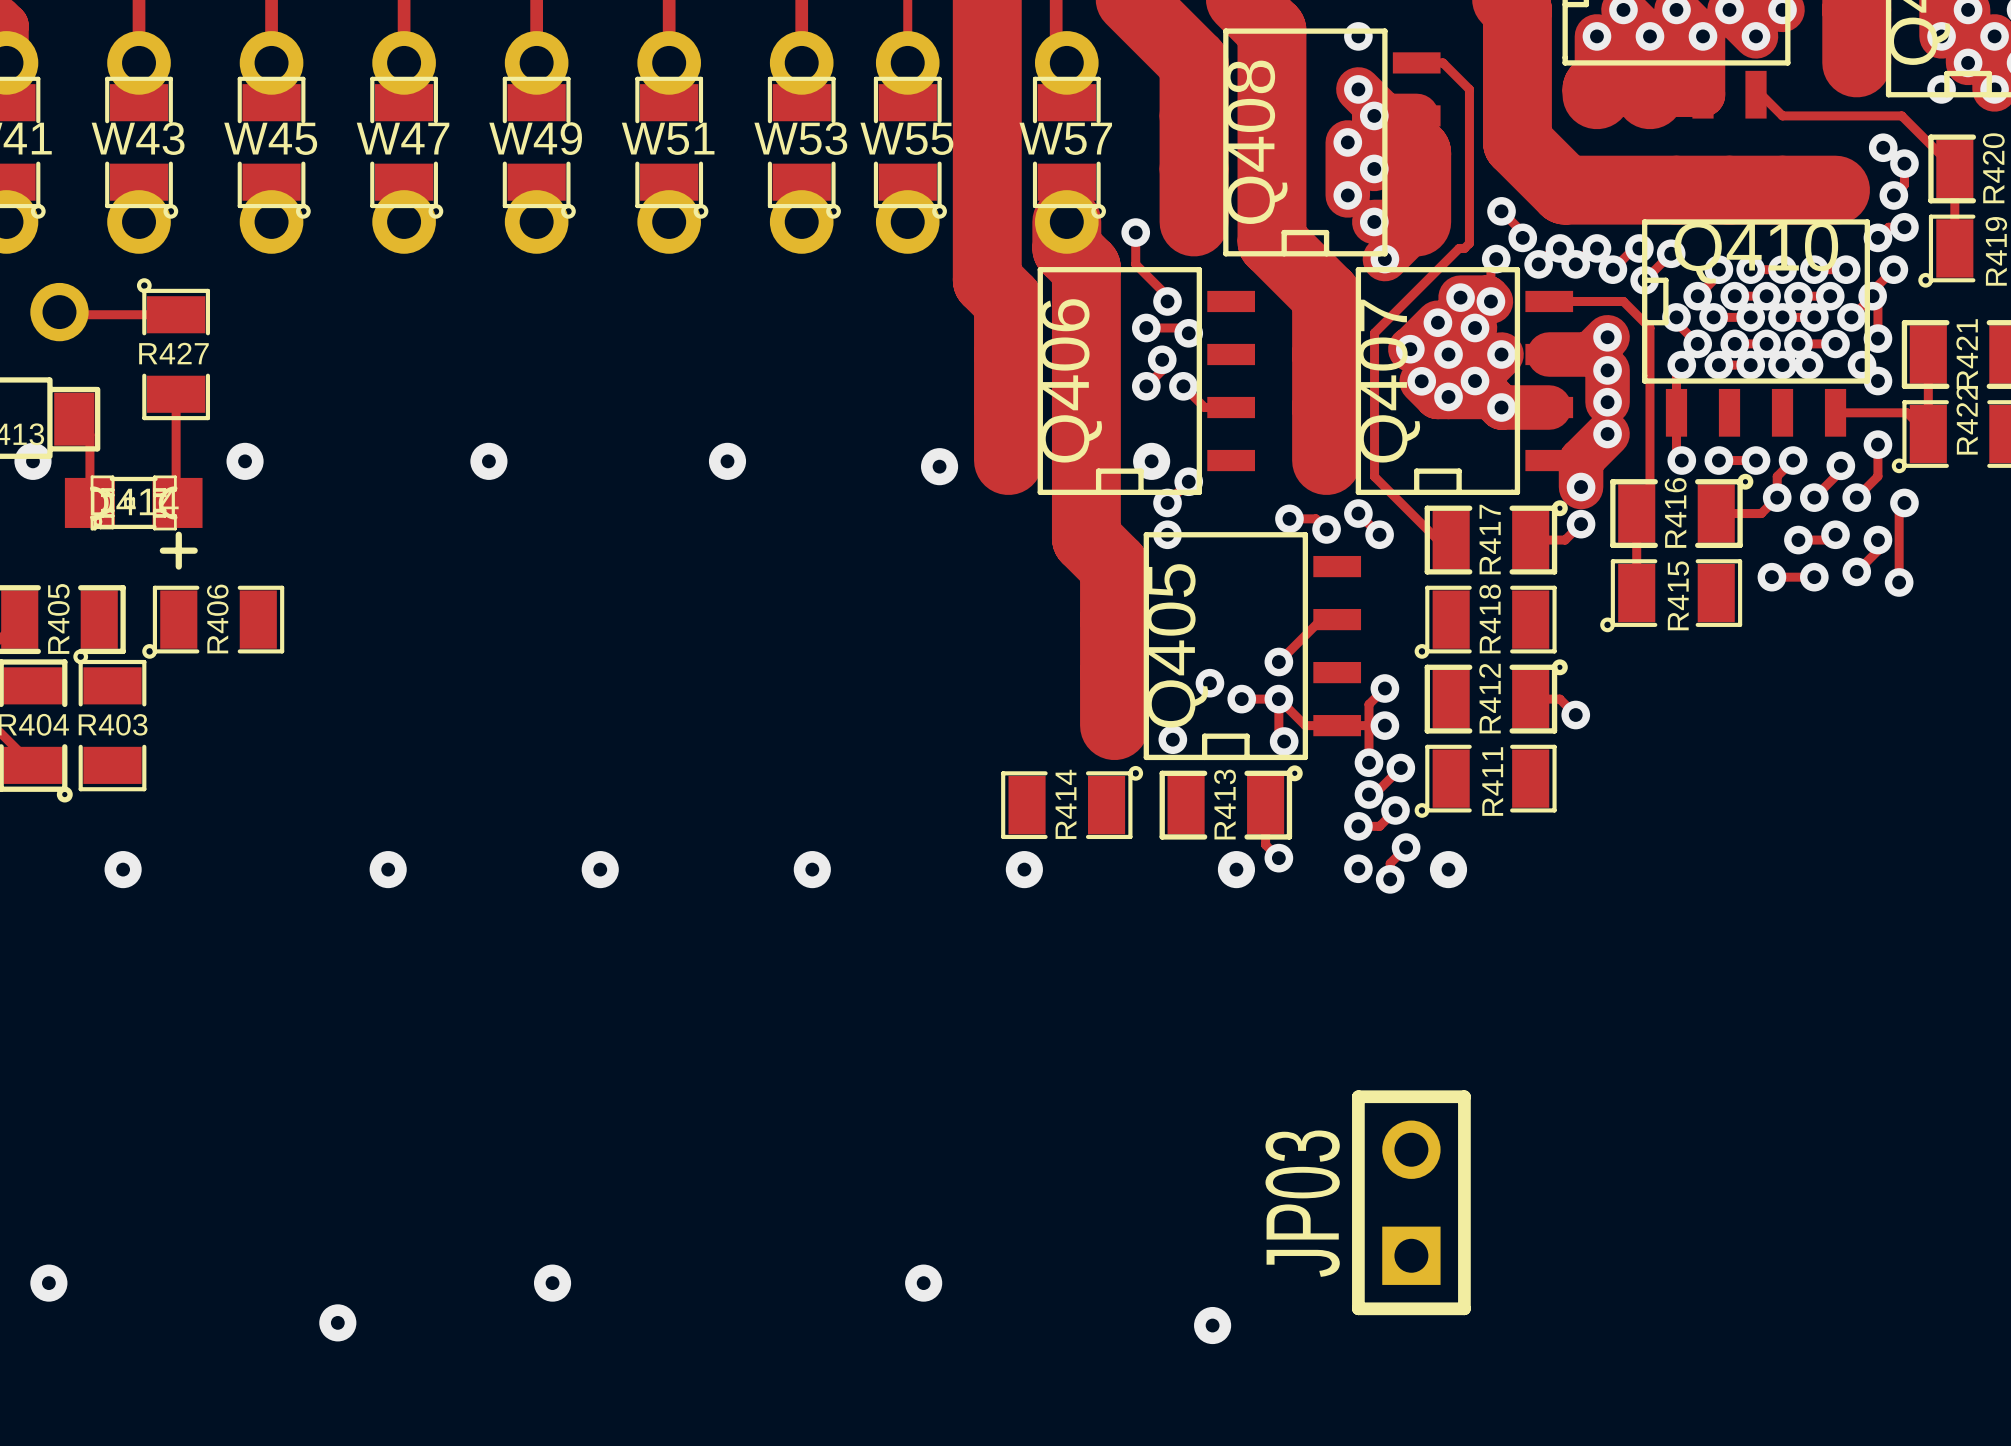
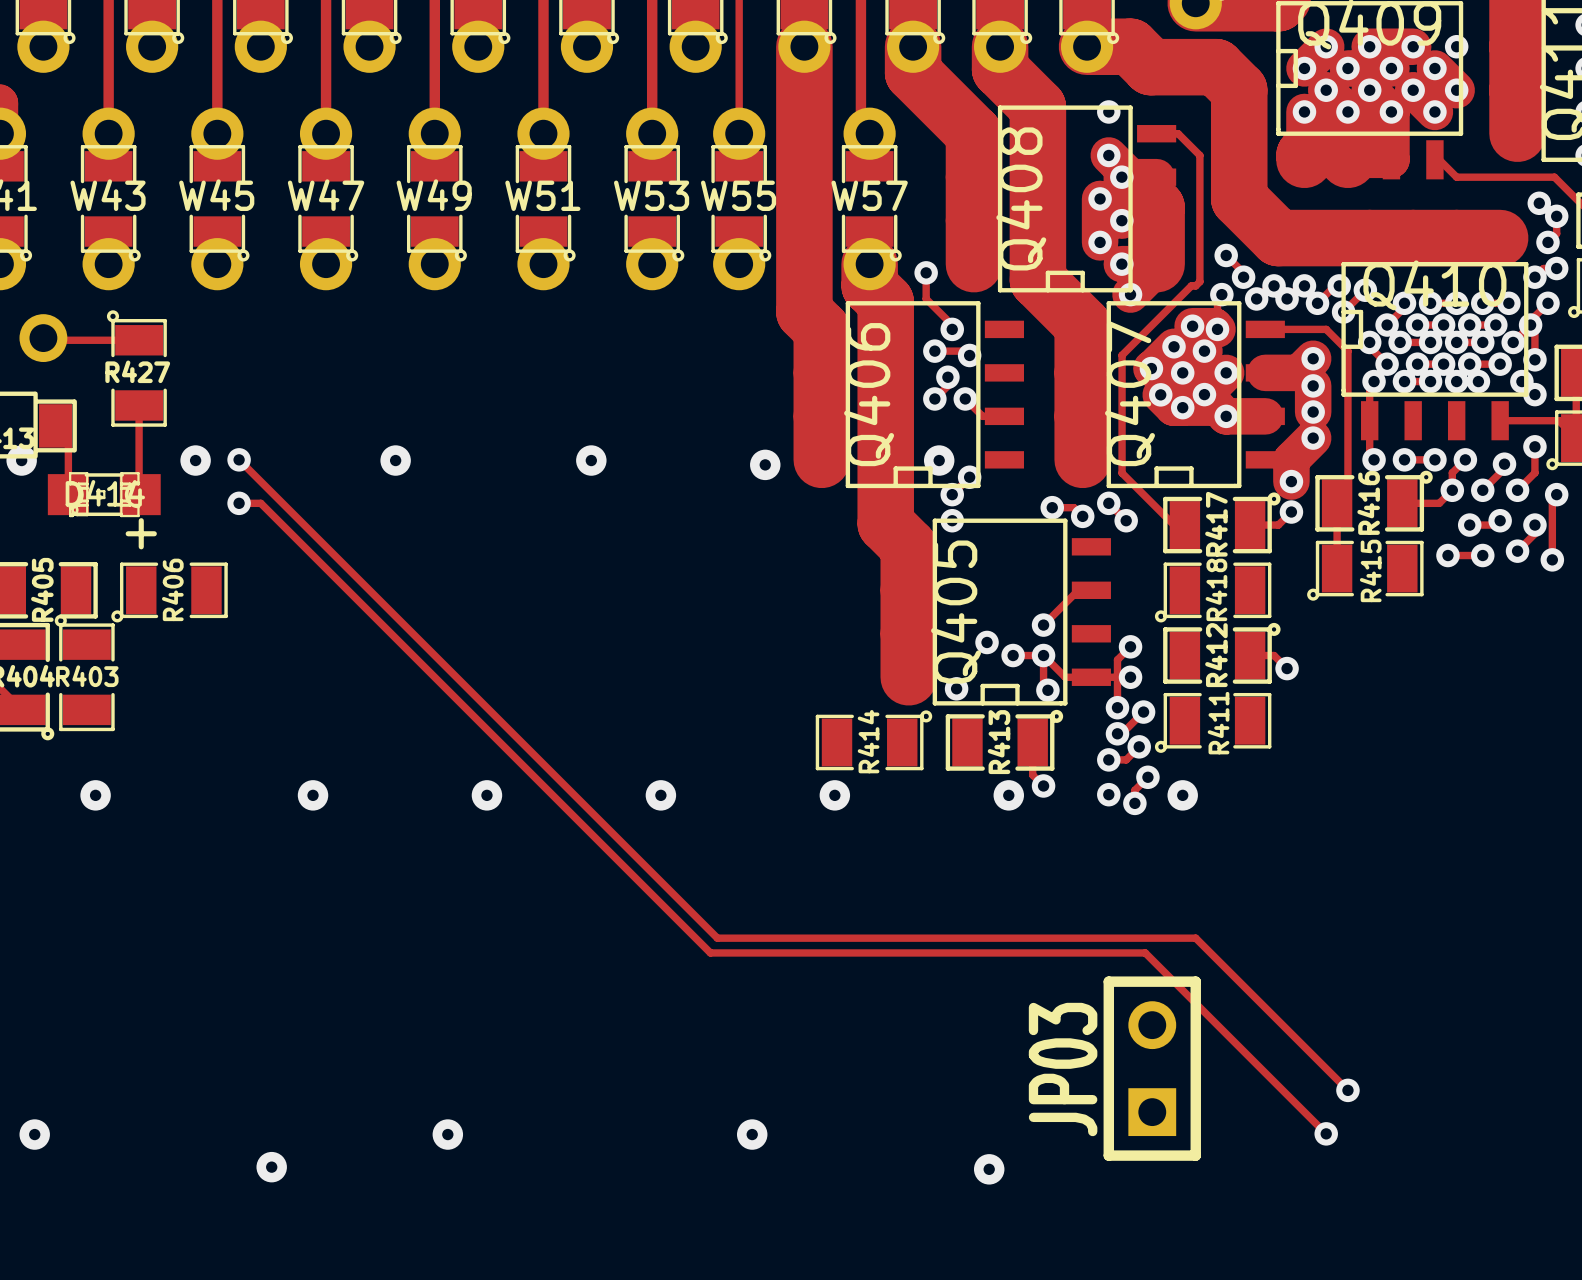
track: none -> (239, 459) (717, 938) (1195, 938) (1347, 1090)
via: none -> (239, 459)
track: none -> (239, 503) (260, 503) (710, 952) (1145, 952) (1326, 1133)
via: none -> (239, 503)
via: none -> (1347, 1090)
via: none -> (1326, 1133)

